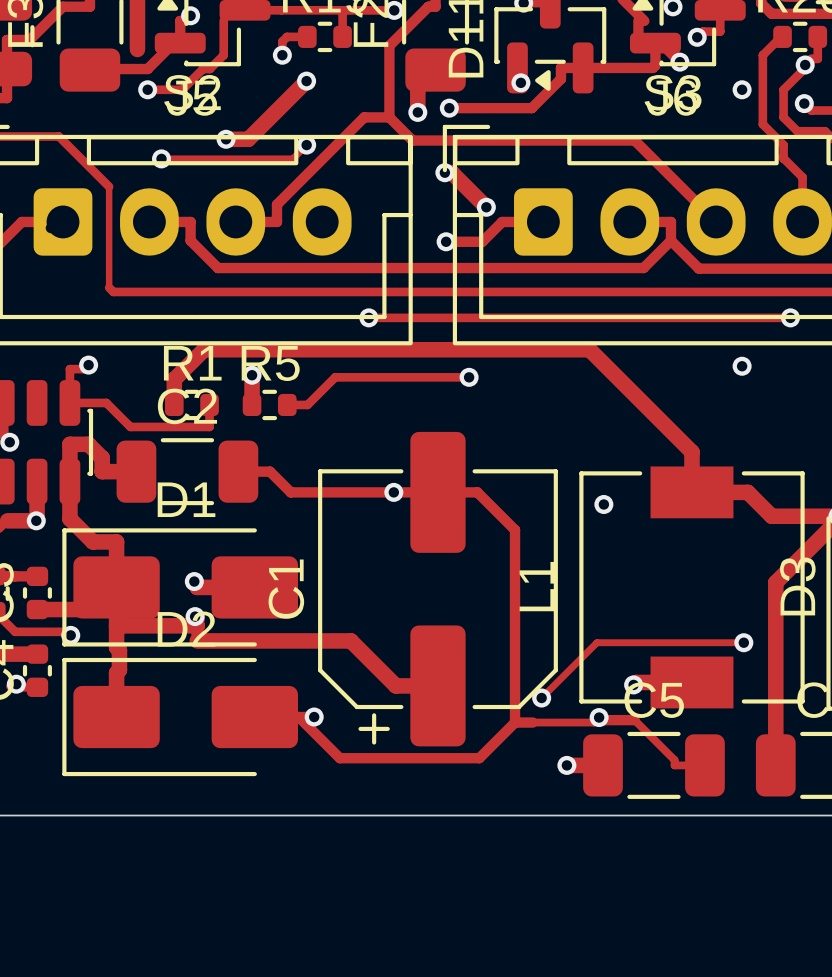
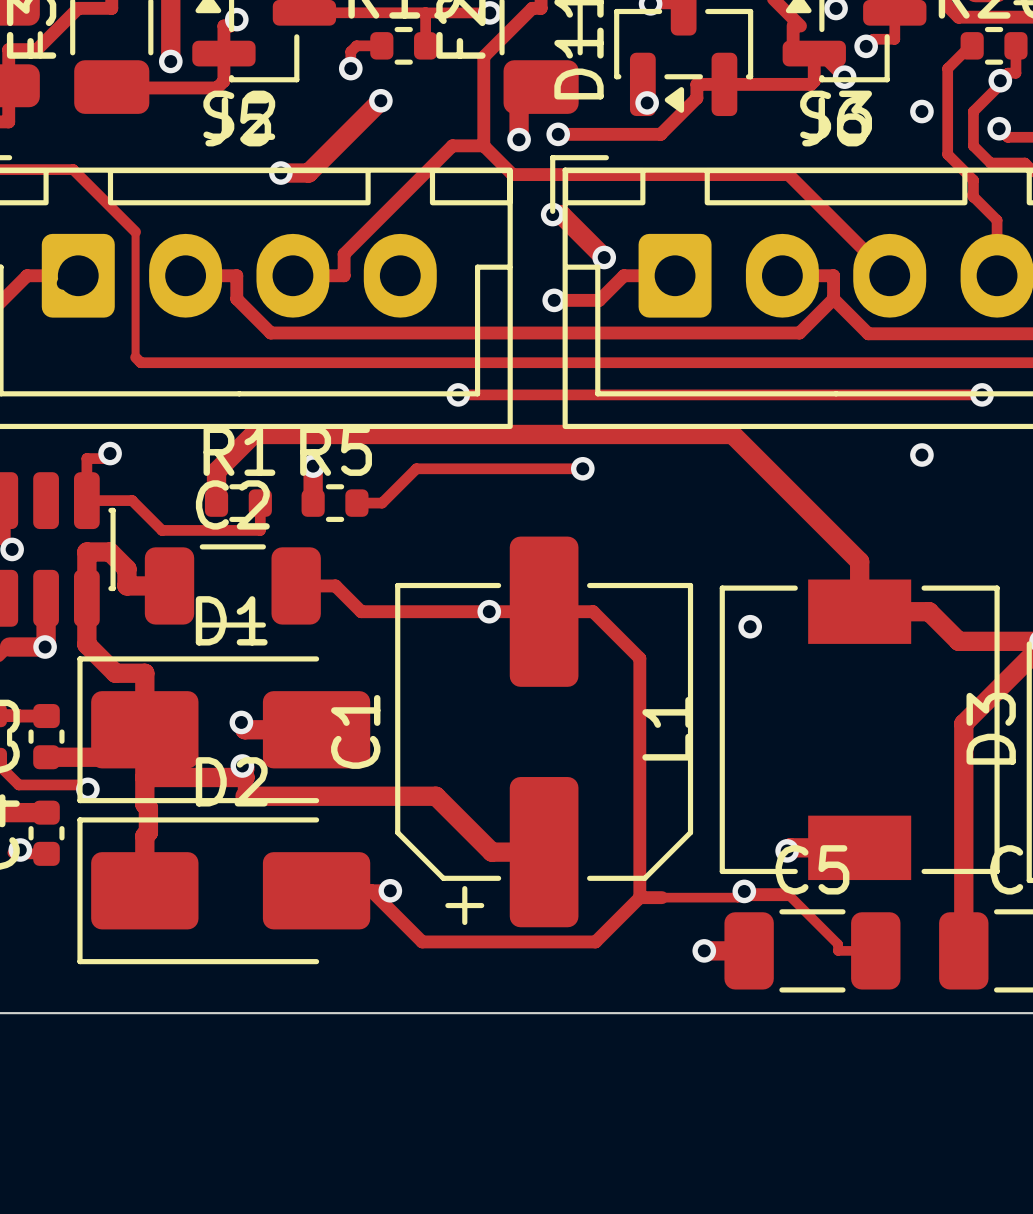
track: (223, 20) (223, 55) (209, 69) (202, 69) (182, 89) (147, 89) -> none
track: none -> (223, 53) (223, 81) (217, 87) (112, 87)
track: (168, 48) (147, 69) (120, 69) -> none
via position: (147, 89) -> (170, 61)
track: (306, 145) (292, 158) (161, 158) -> none
via: (306, 145) -> none
via: (161, 158) -> none
track: (743, 642) (596, 642) (541, 698) -> none
via: (743, 642) -> none
via: (541, 698) -> none

